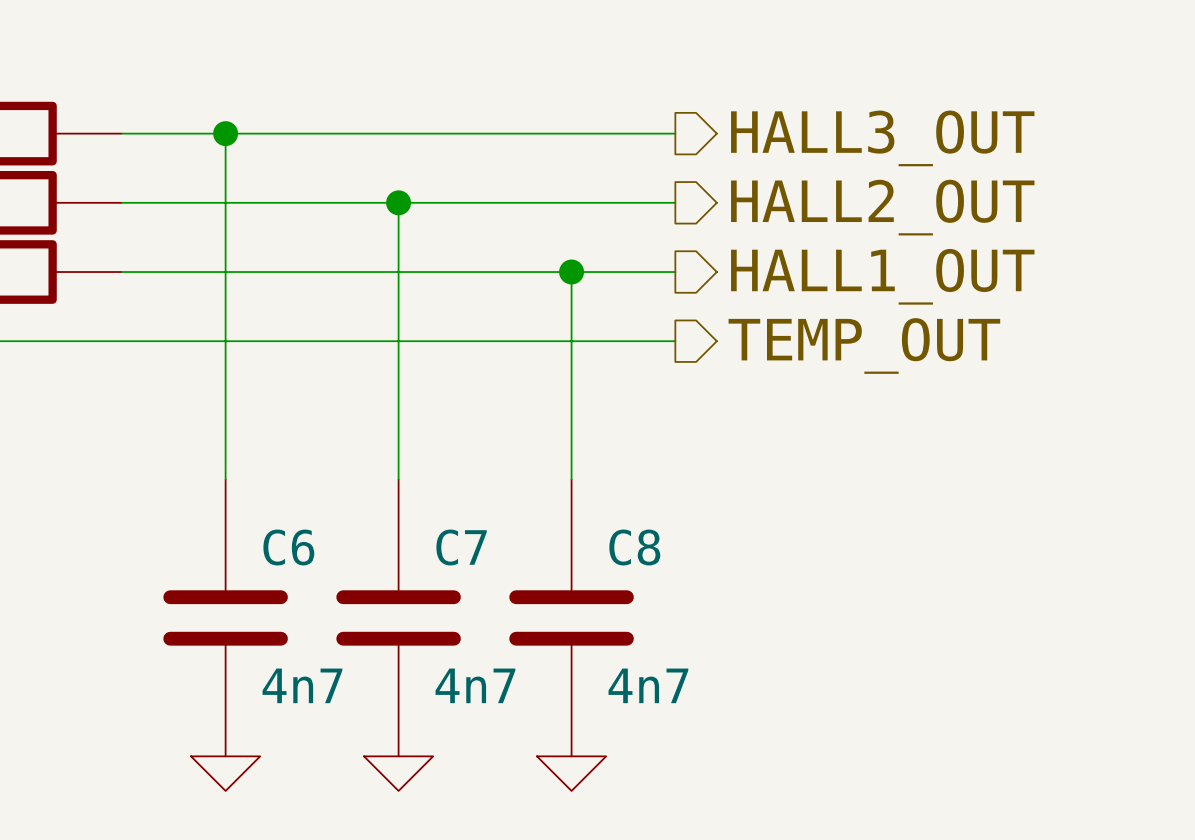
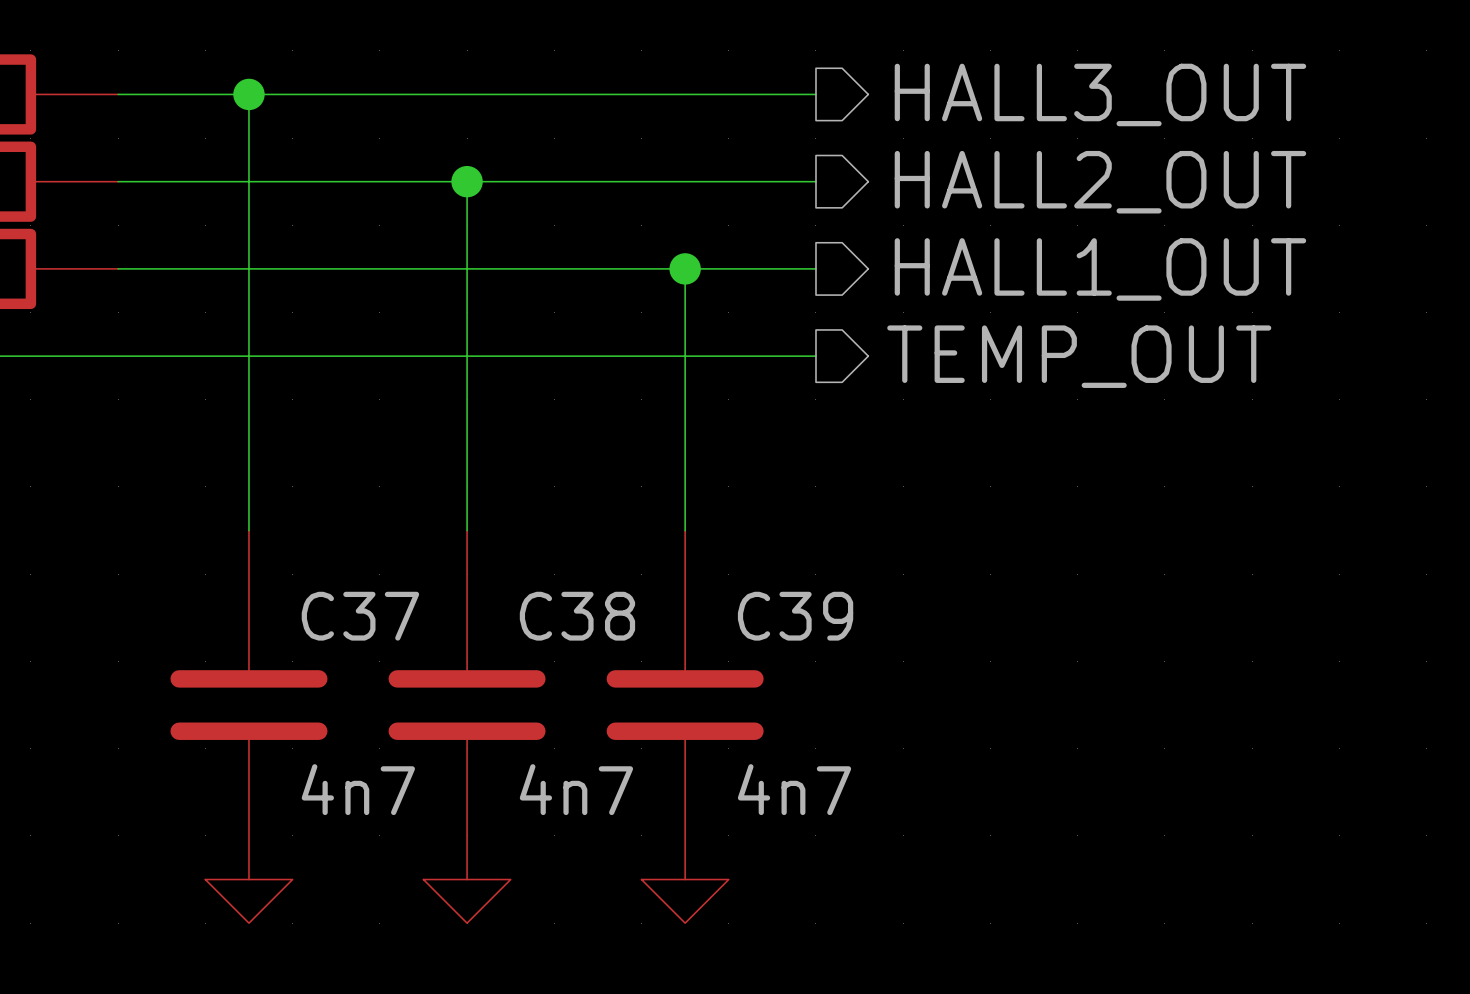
C6 name: C6 (288, 547) -> C37 (360, 616)
C7 name: C7 (461, 547) -> C38 (577, 616)
C8 name: C8 (634, 547) -> C39 (795, 616)

